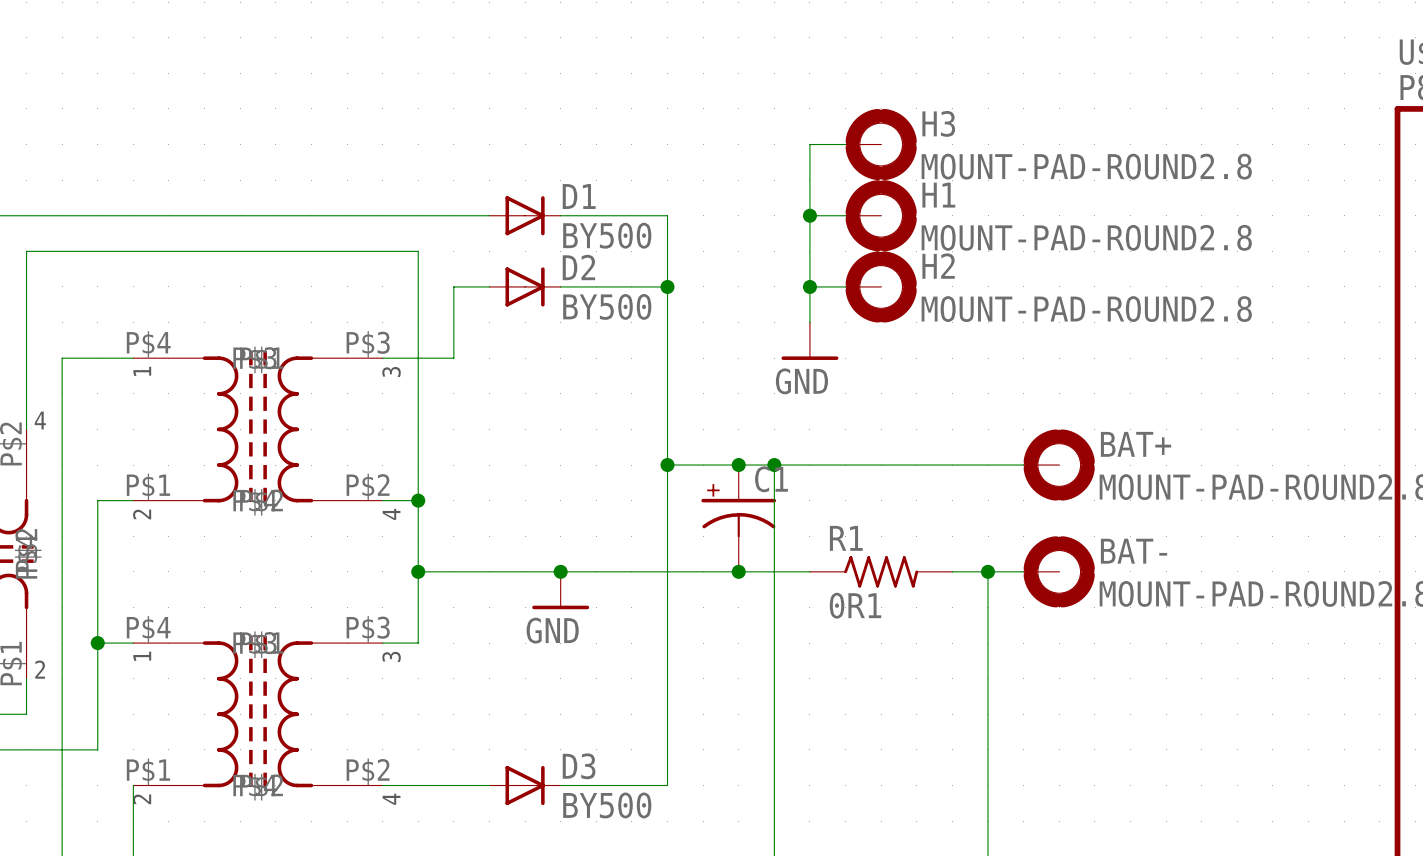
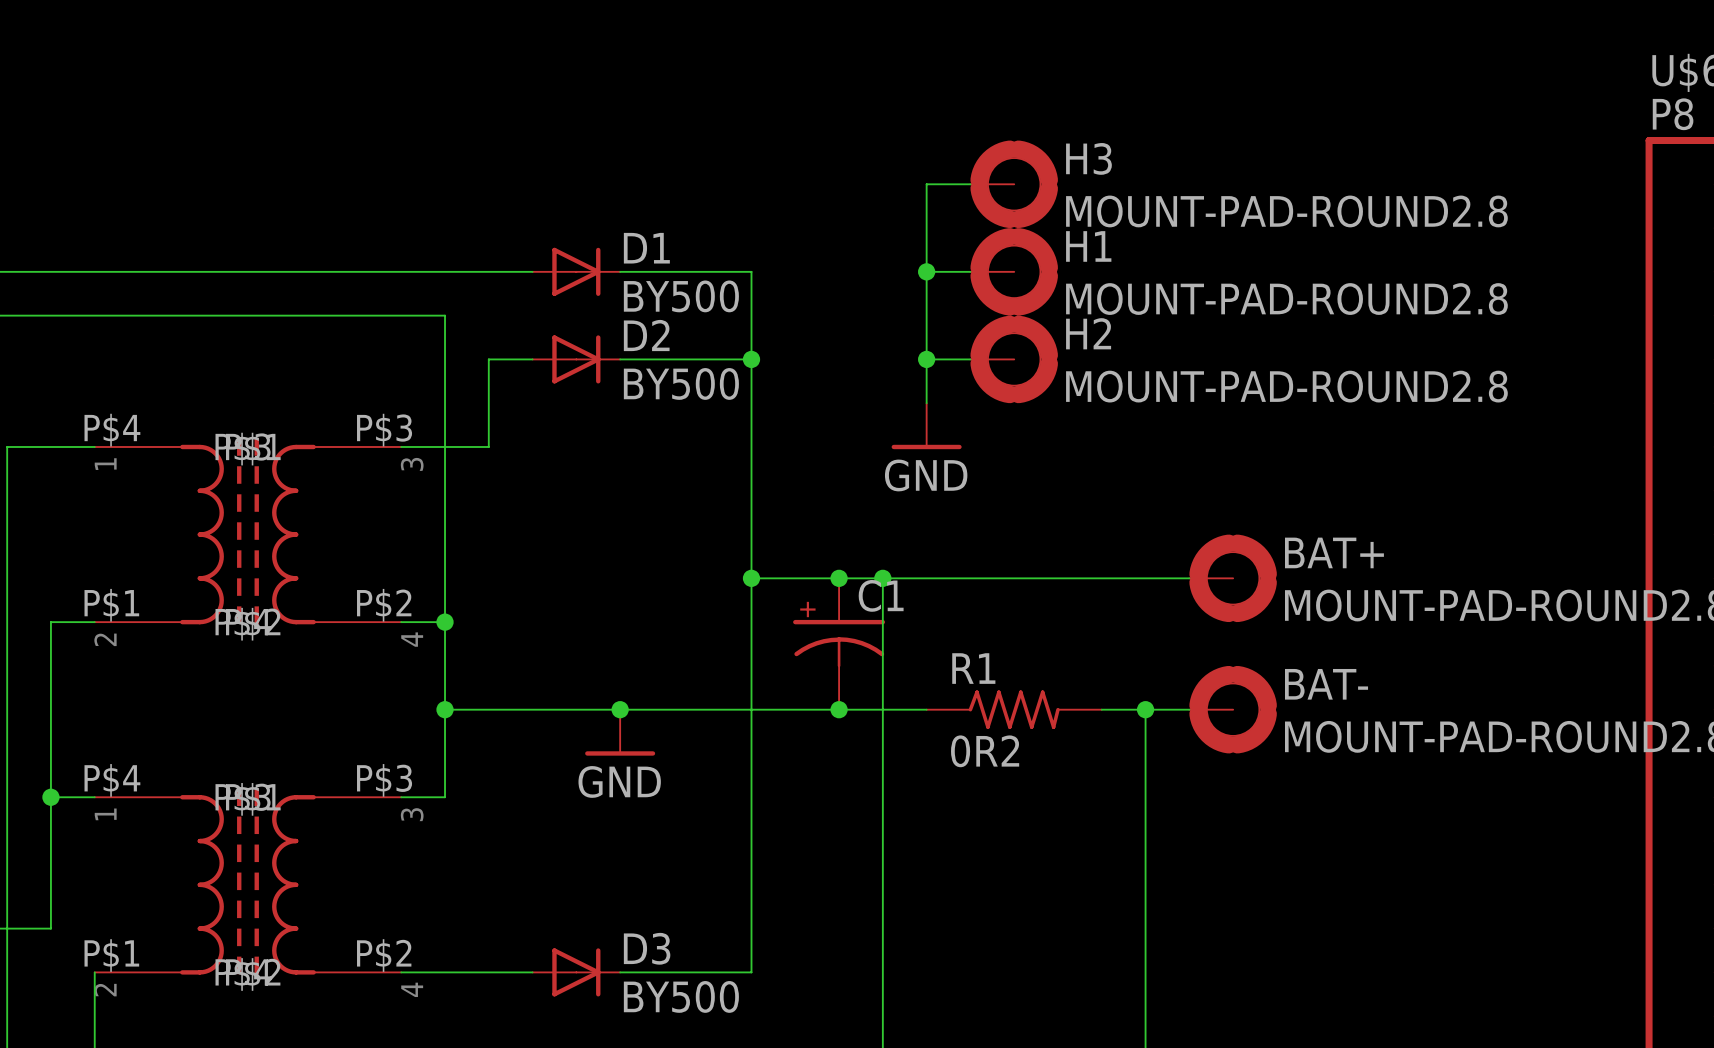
R1 value: 0R1 (855, 605) -> 0R2 (985, 751)

